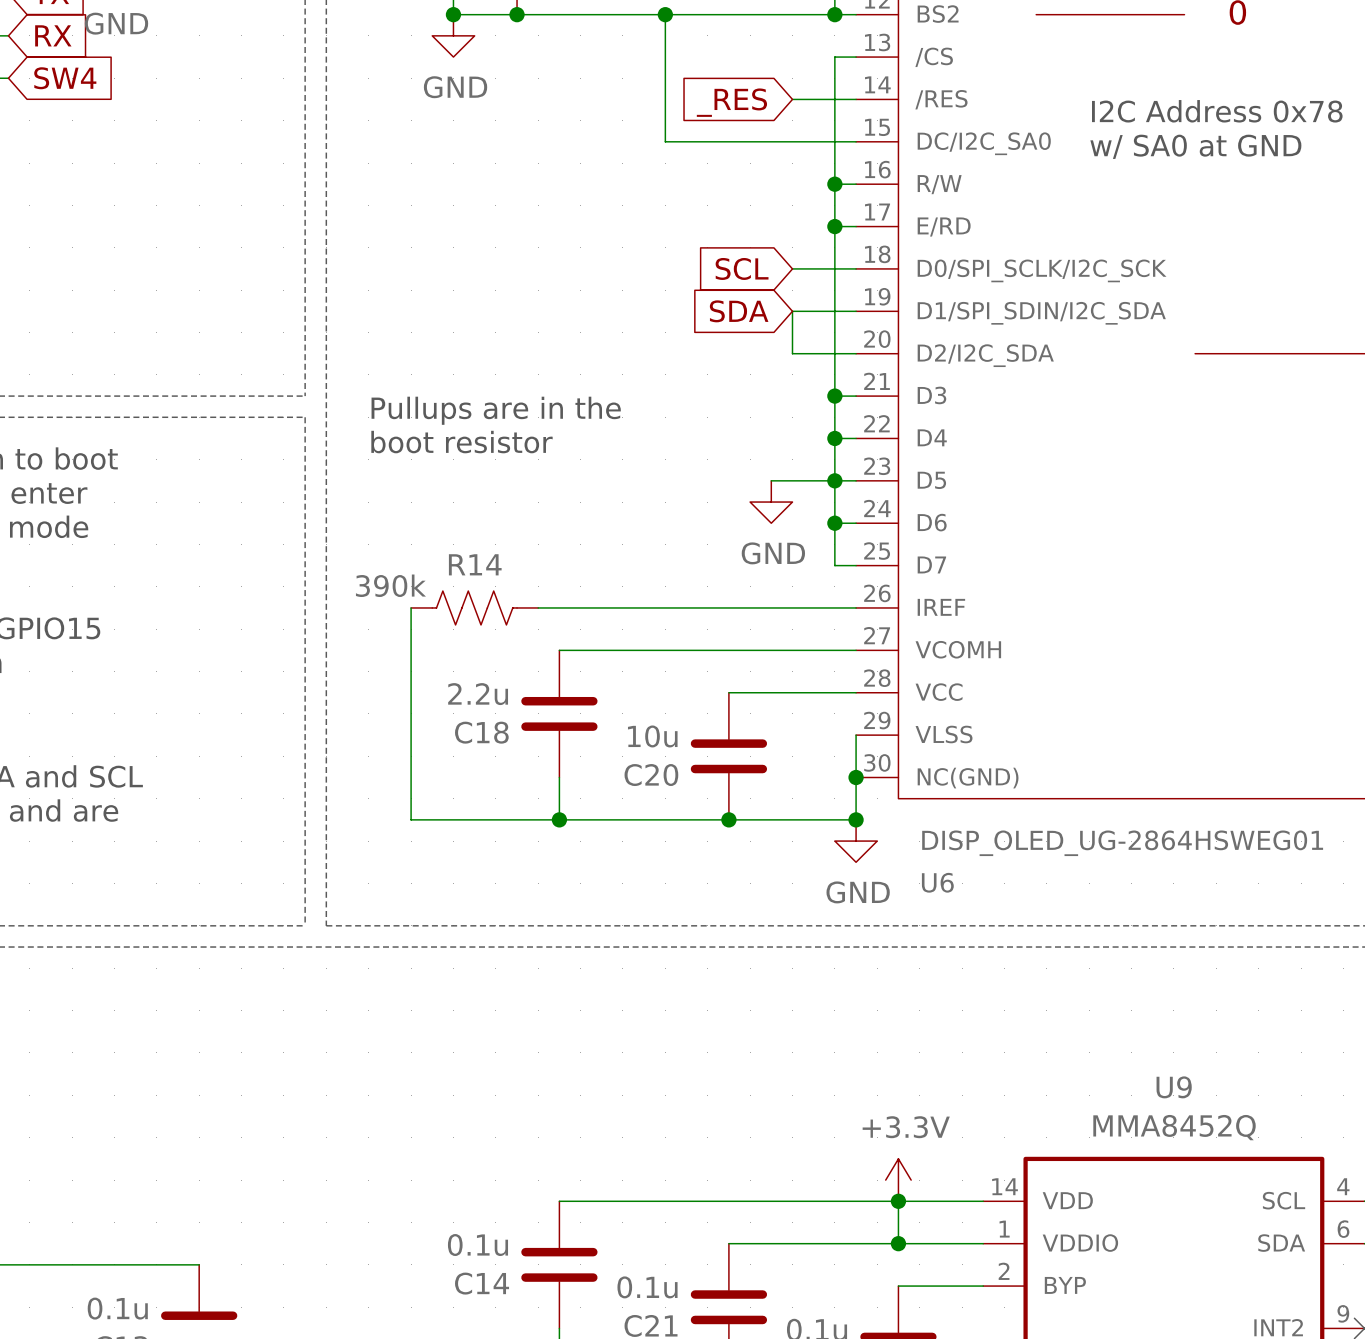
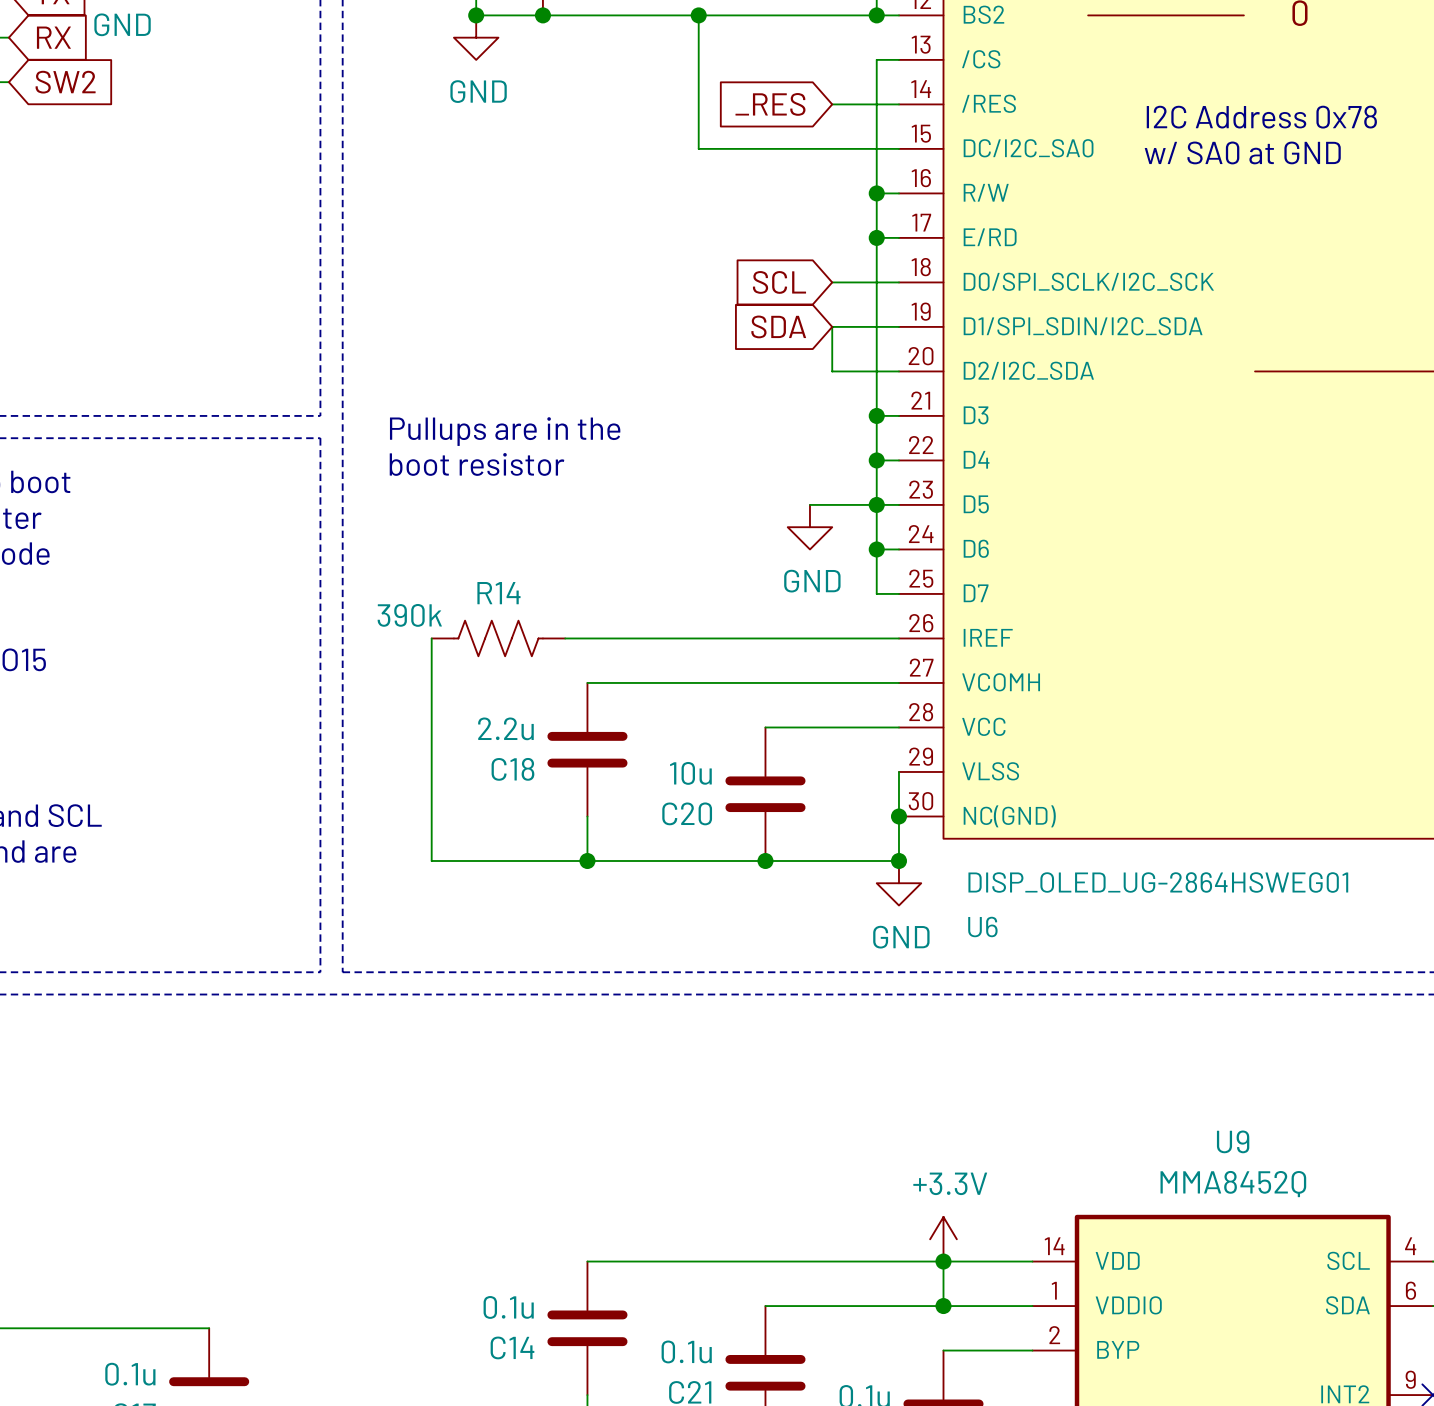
global label: SW4 (65, 78) -> SW2 (65, 82)

